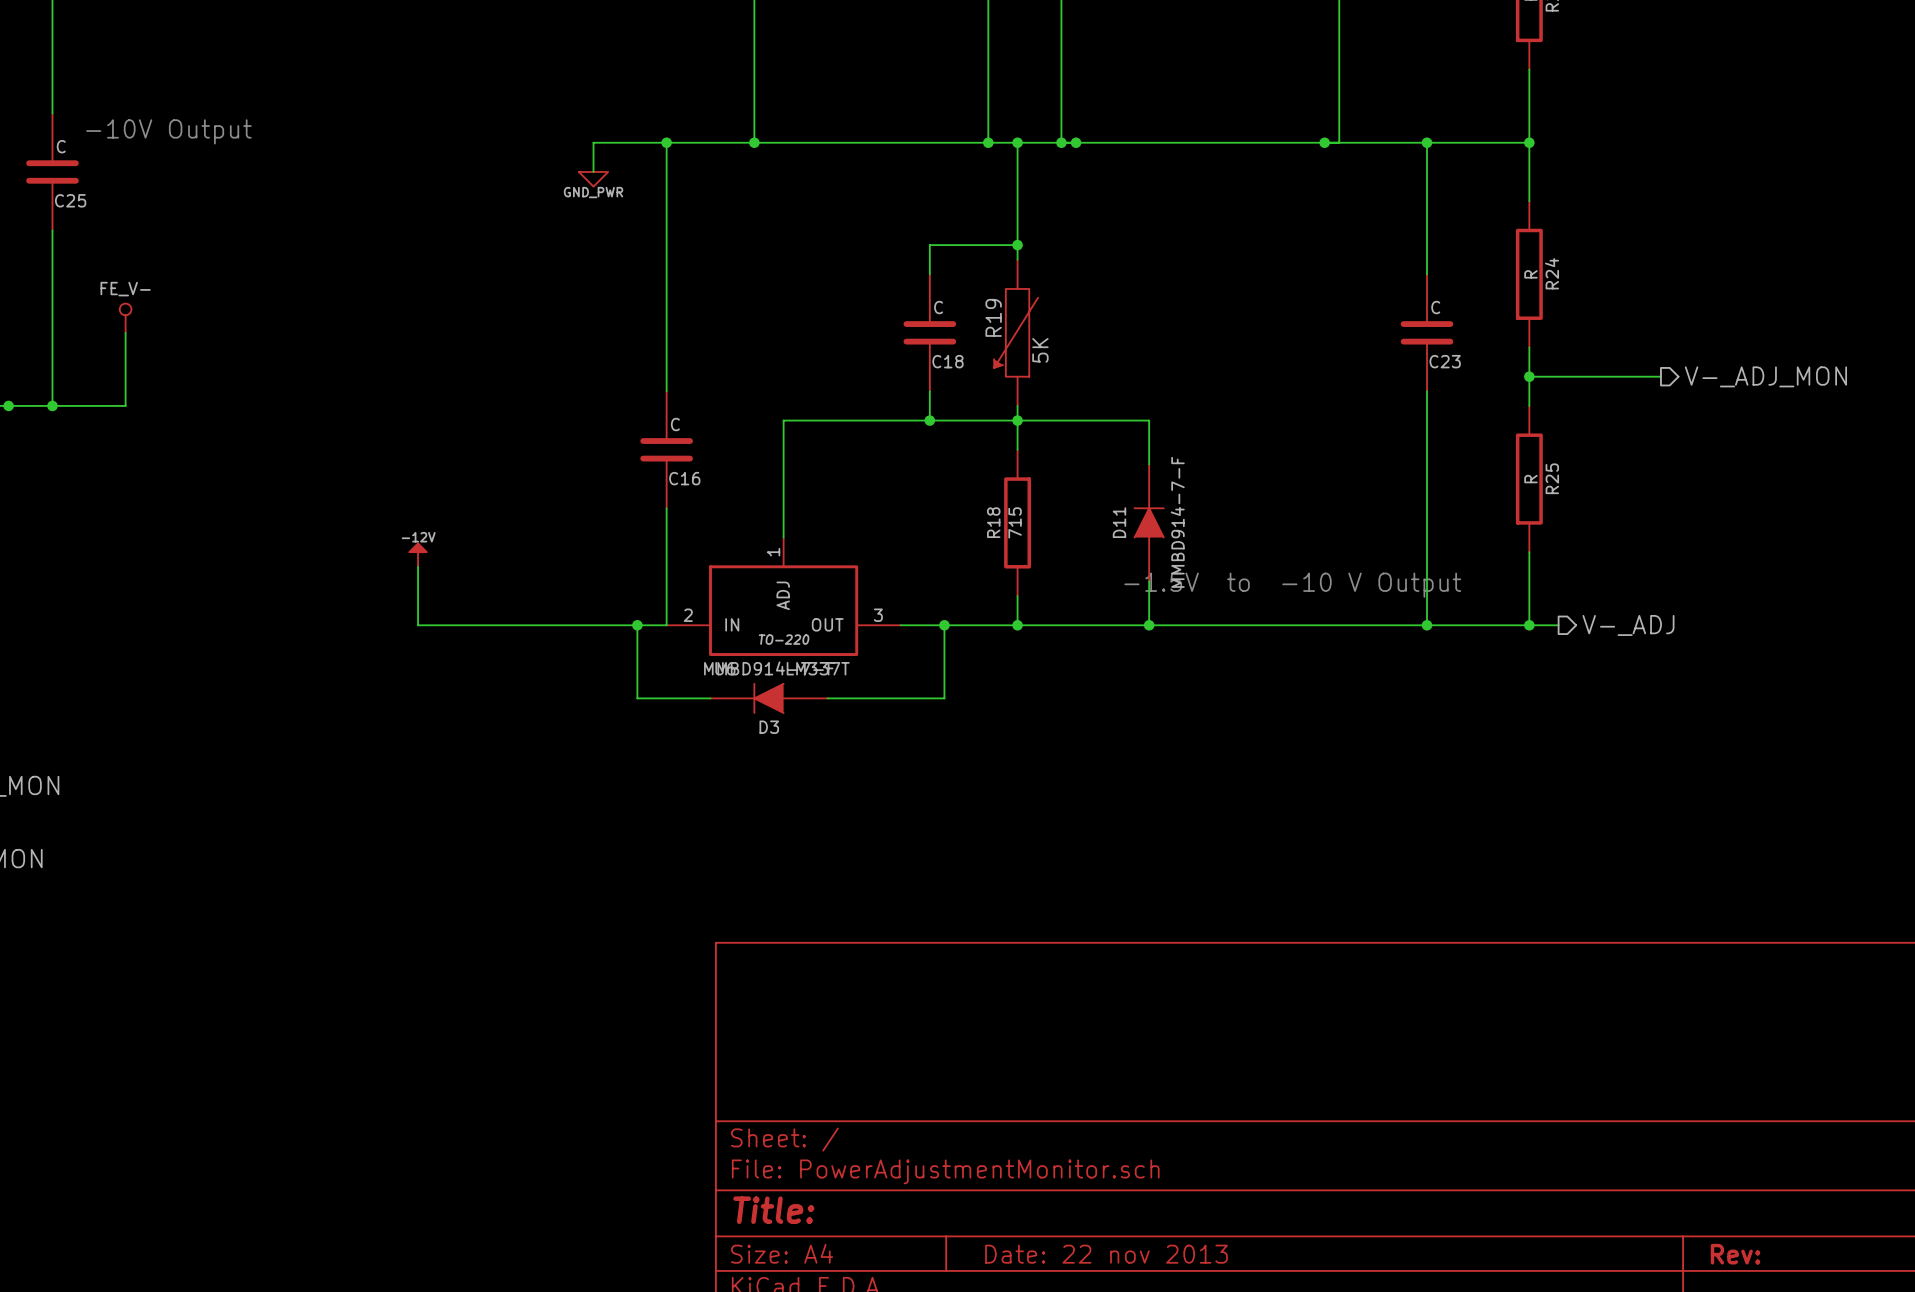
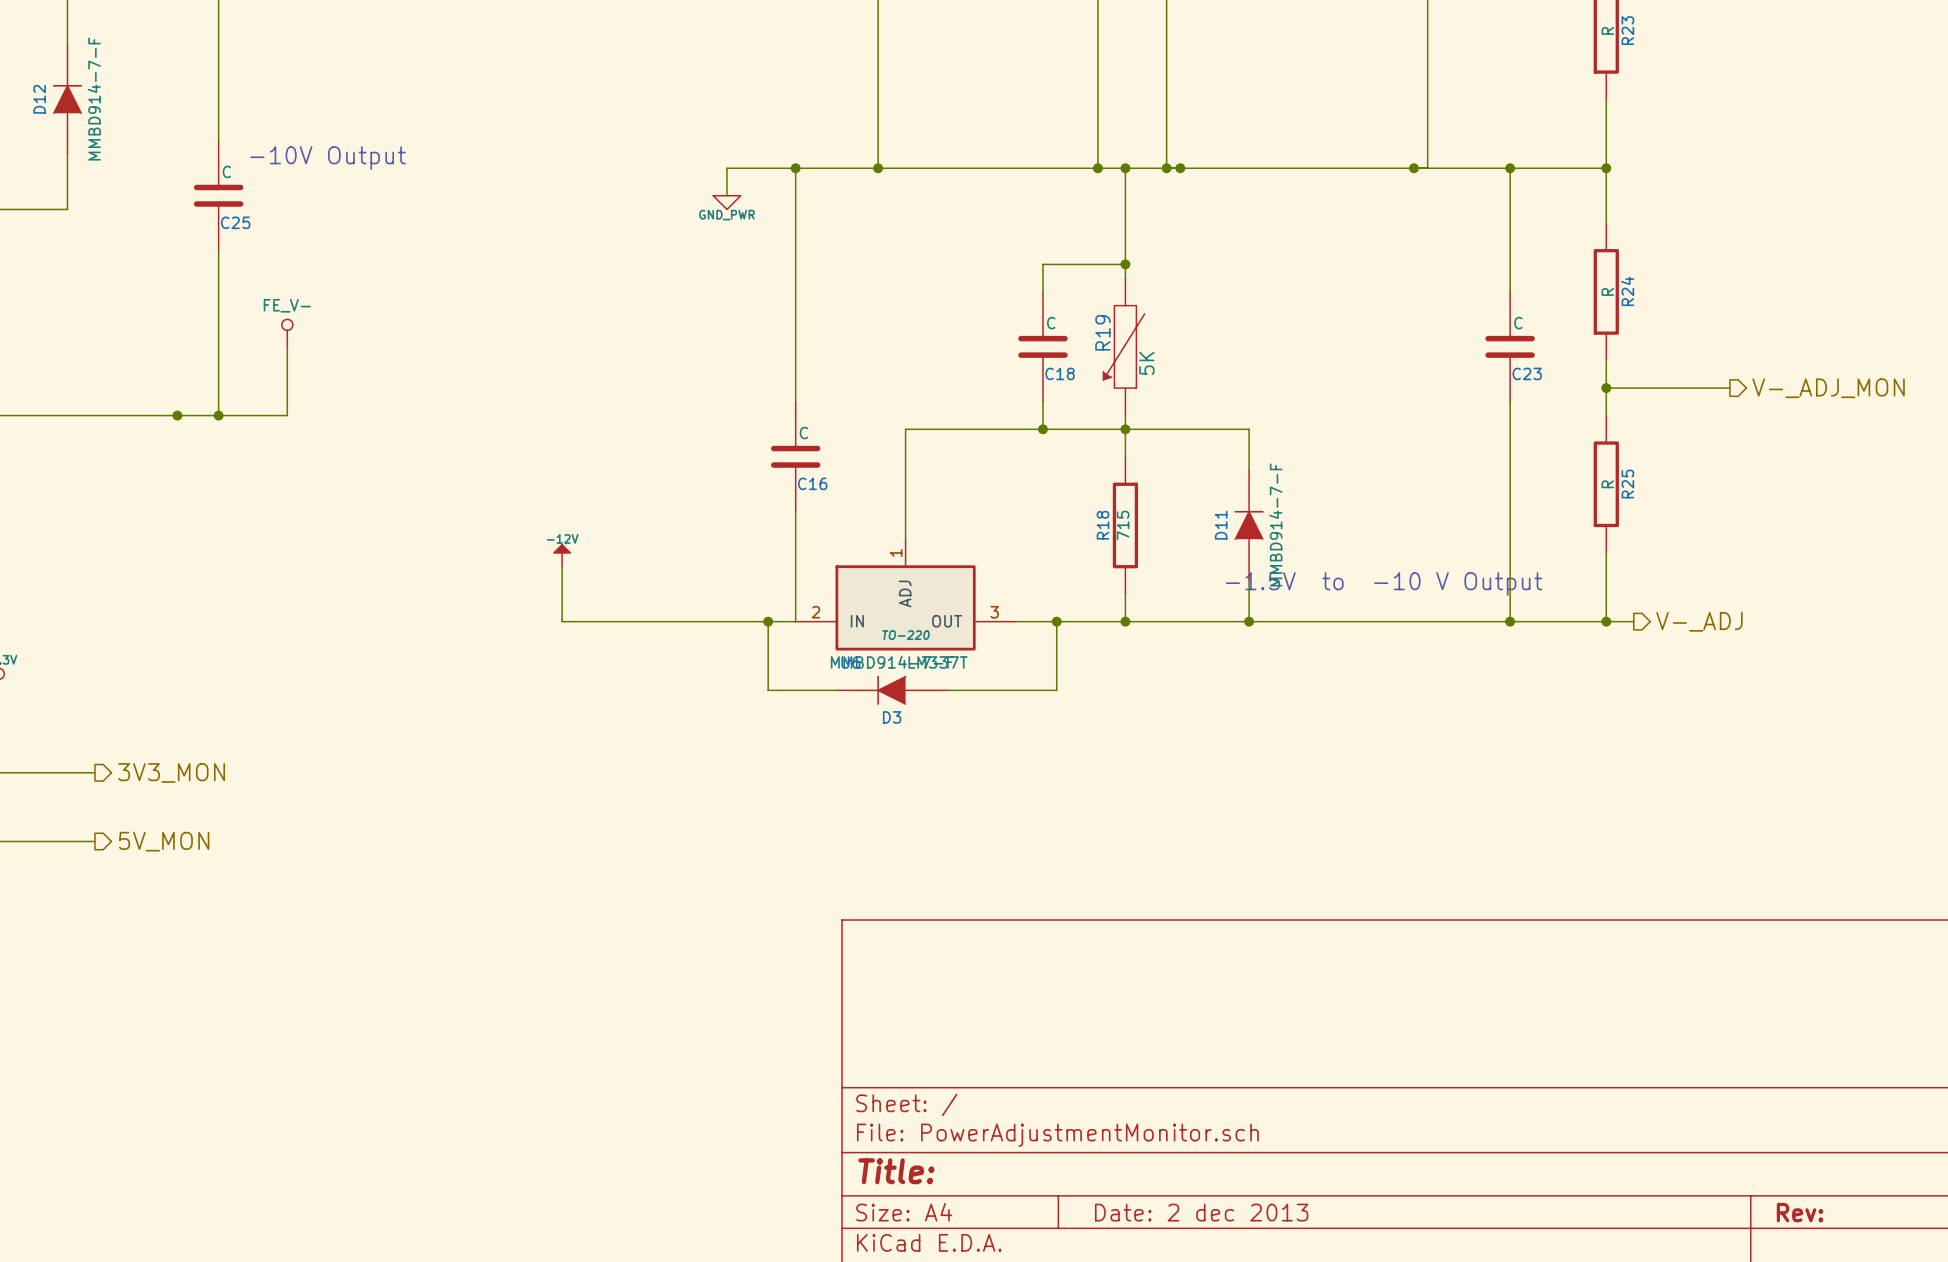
title block: Date: 22 nov 2013 (1106, 1254) -> Date: 2 dec 2013 (1201, 1212)

